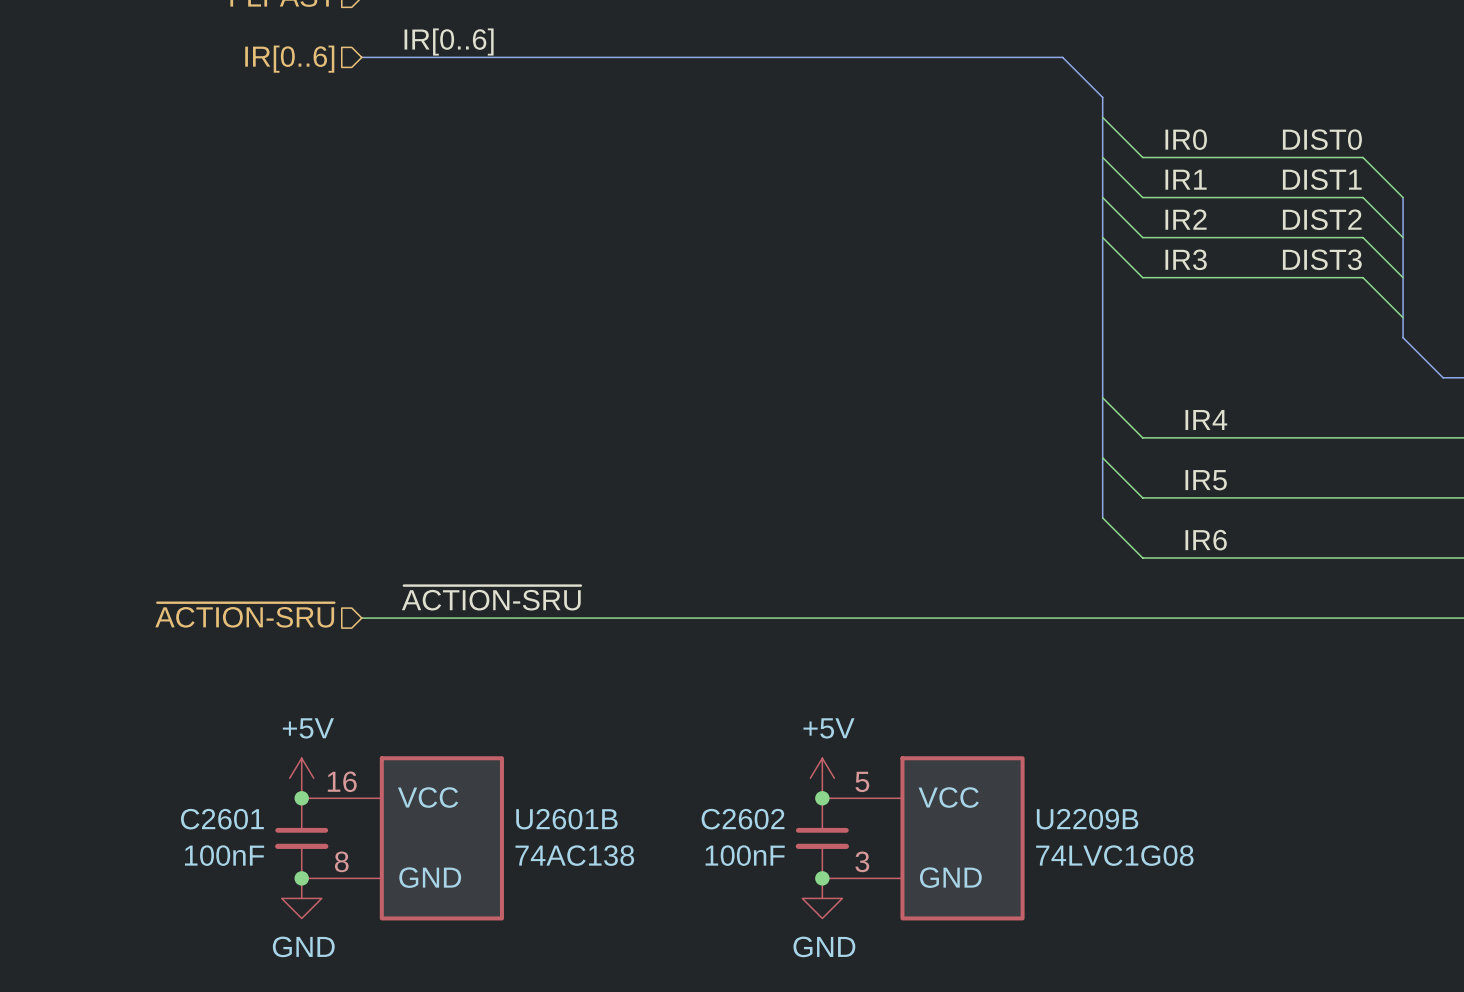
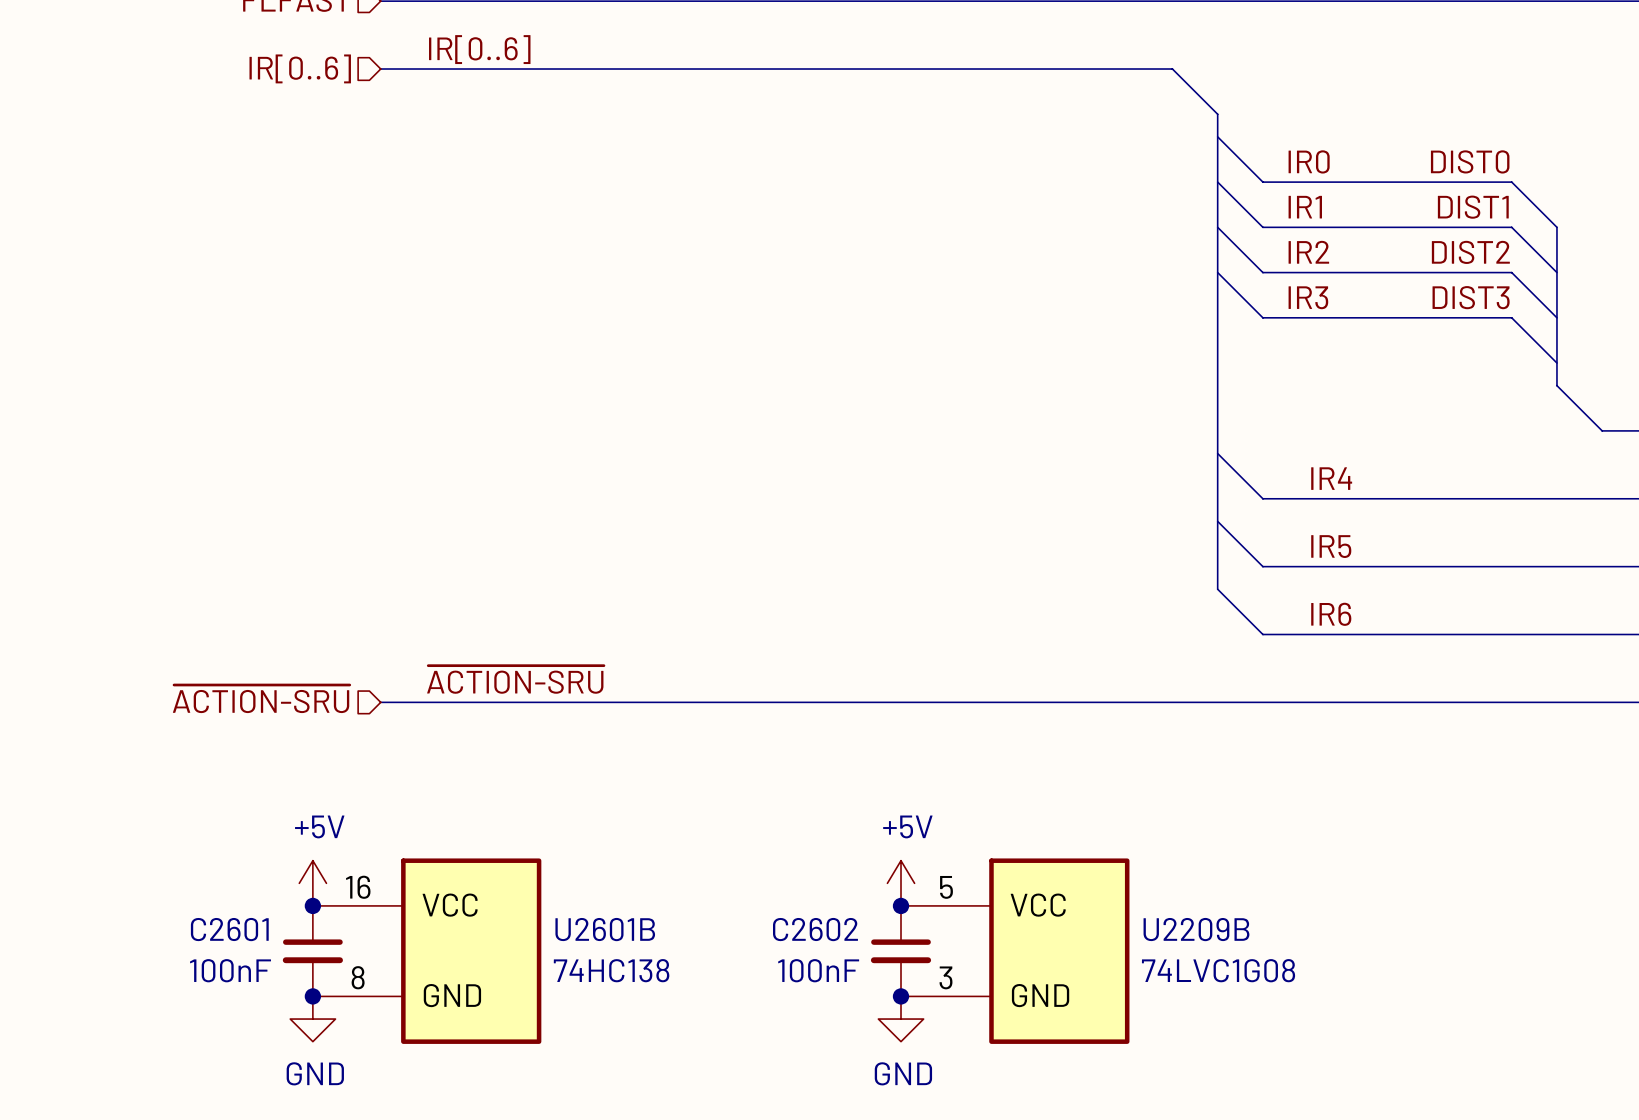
U2601B value: 74AC138 (574, 855) -> 74HC138 (611, 970)

